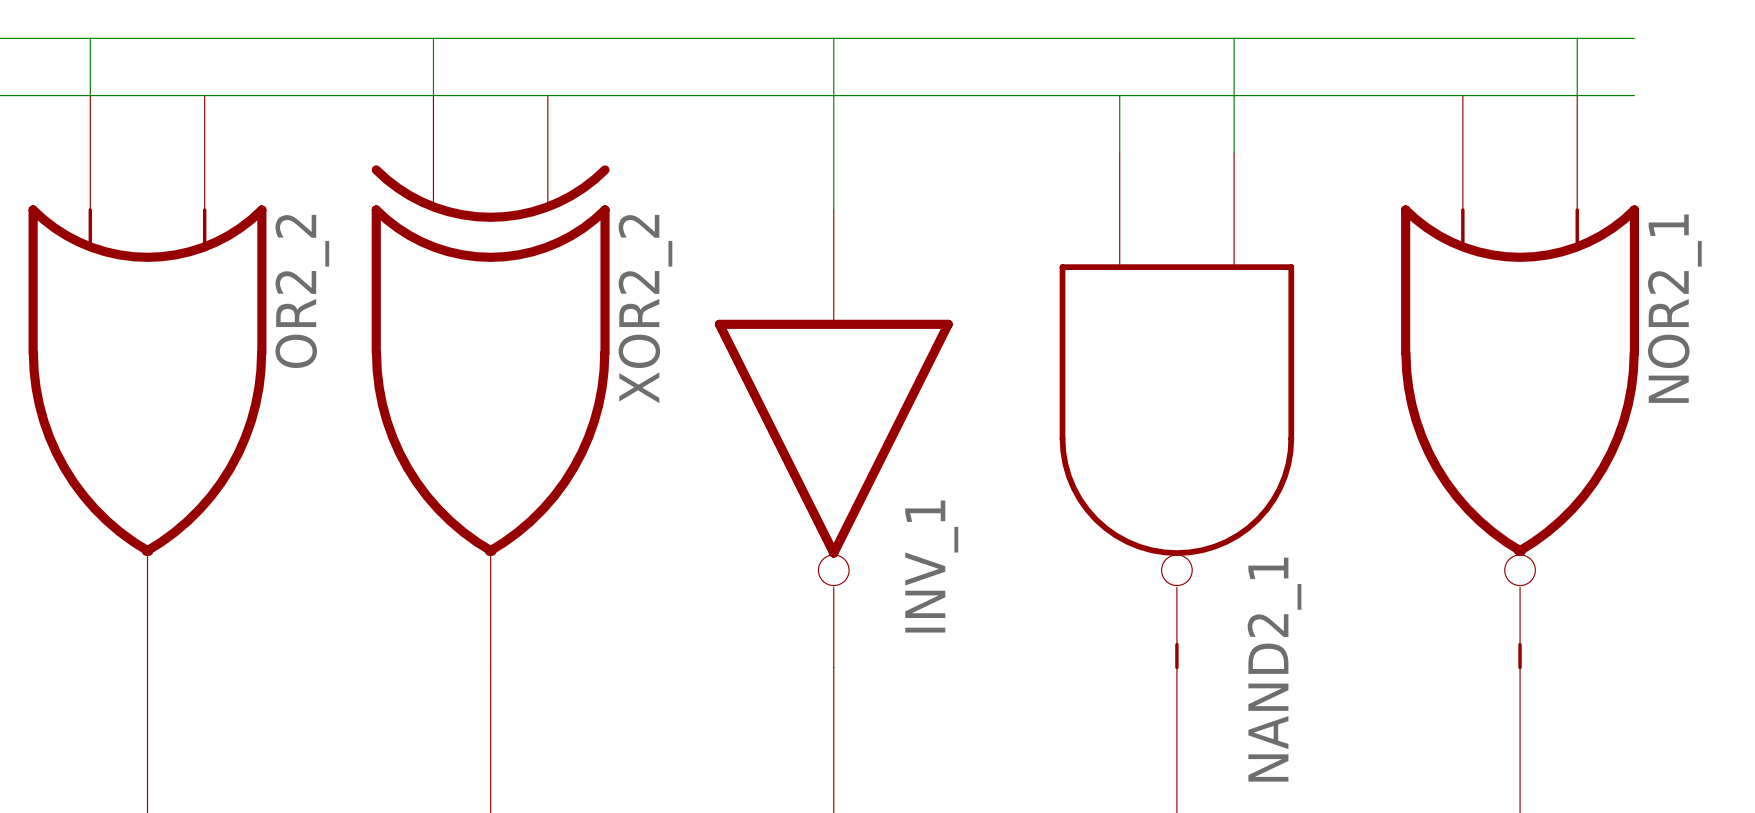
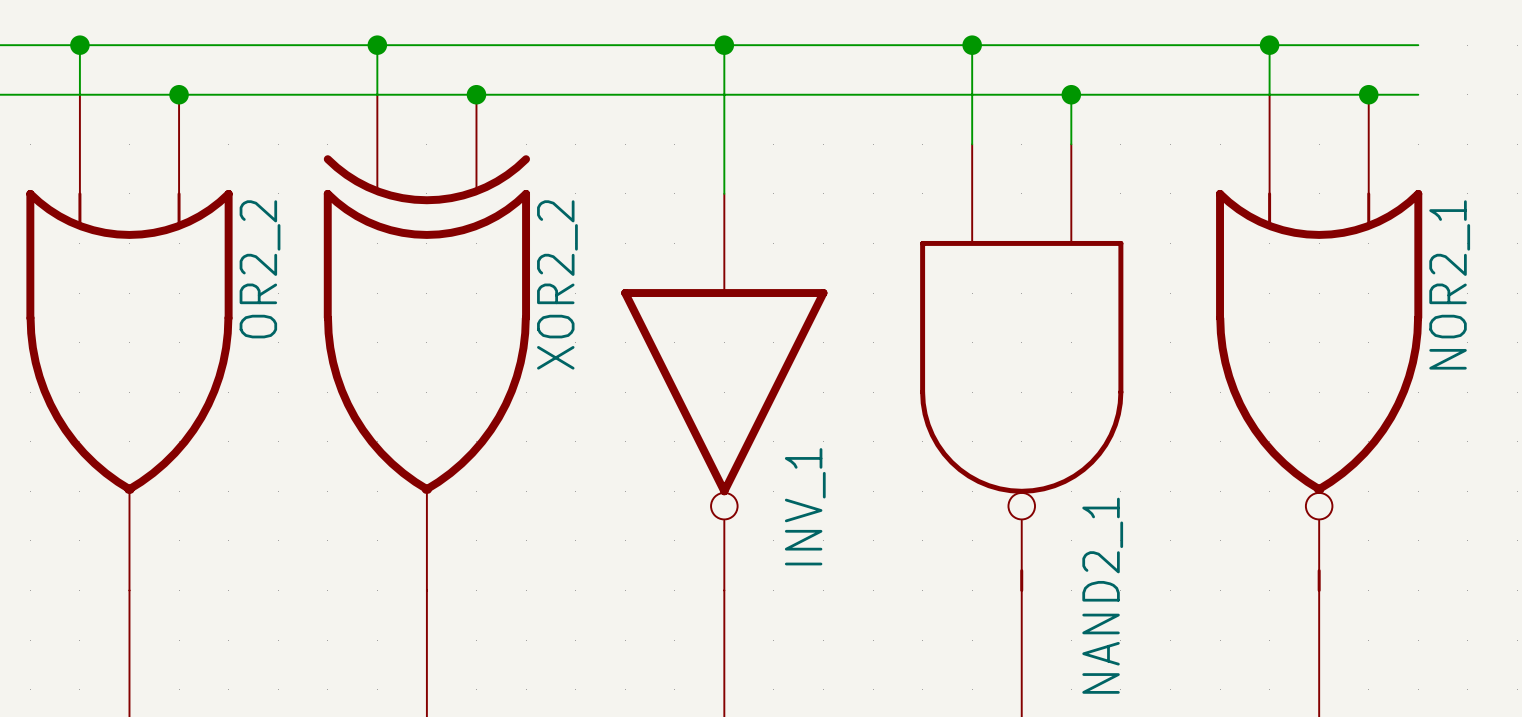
junction: none -> (79, 45)
junction: none -> (377, 45)
junction: none -> (724, 45)
junction: none -> (972, 45)
wire: (1234, 38) (1234, 95) -> (972, 45) (972, 94)
junction: none -> (1269, 45)
wire: (1577, 38) (1577, 95) -> (1269, 45) (1269, 94)
junction: none -> (179, 94)
junction: none -> (476, 94)
junction: none -> (1071, 94)
junction: none -> (1368, 94)

